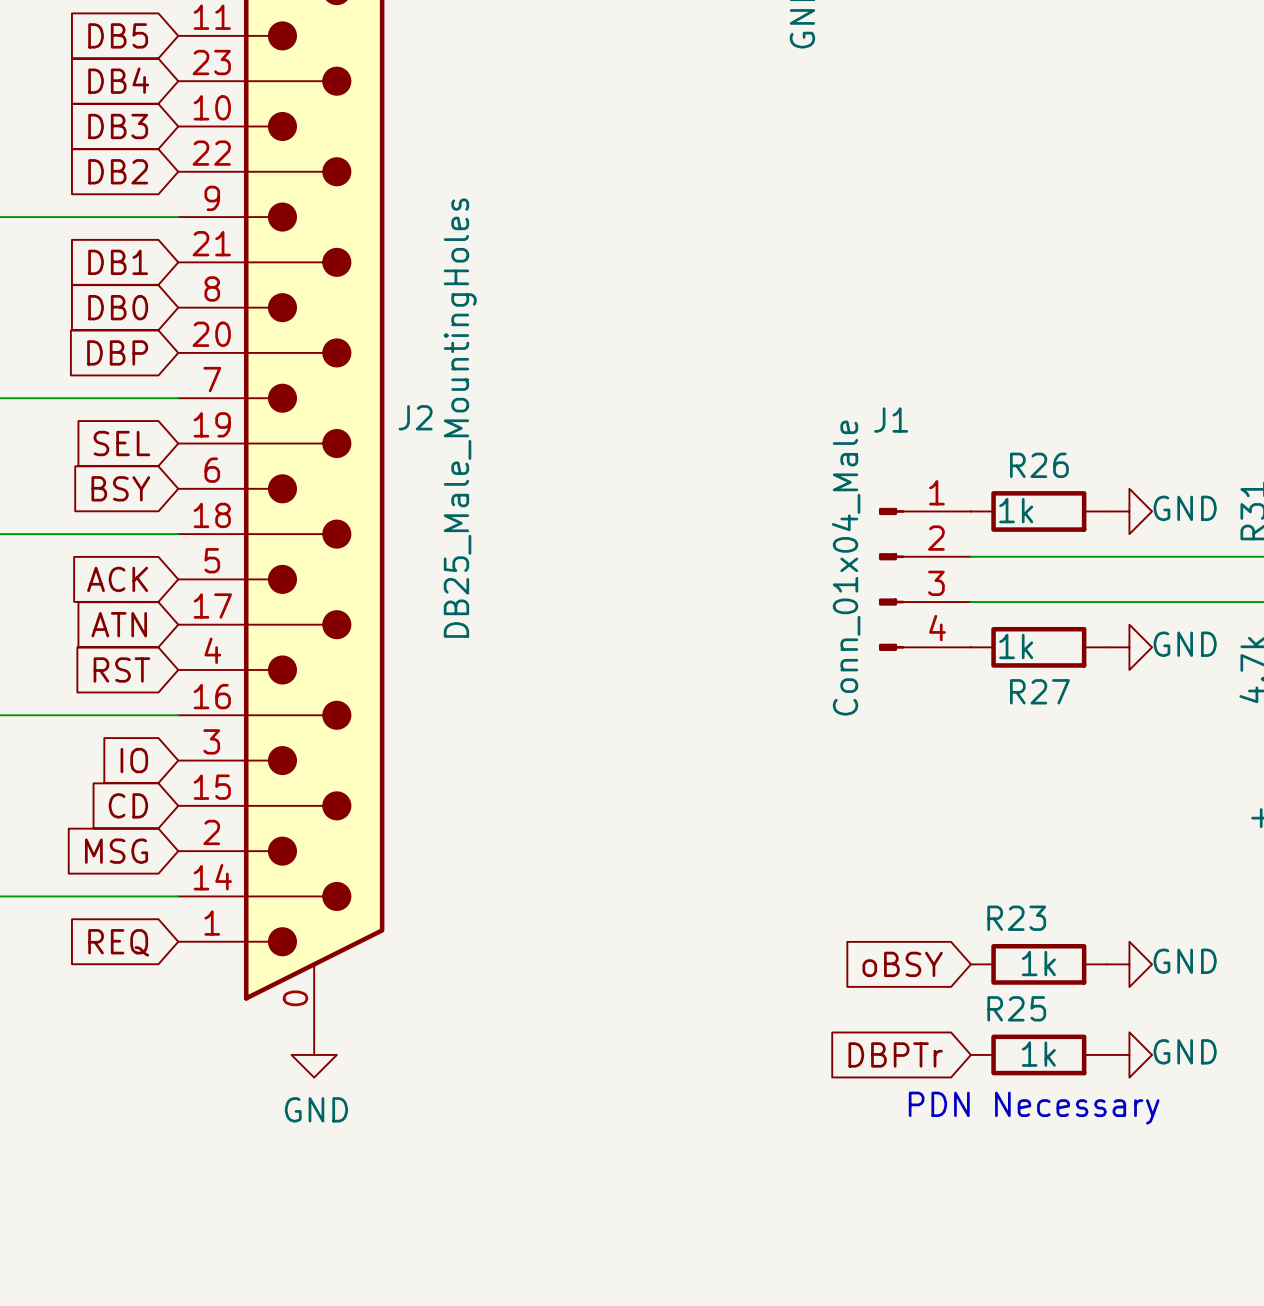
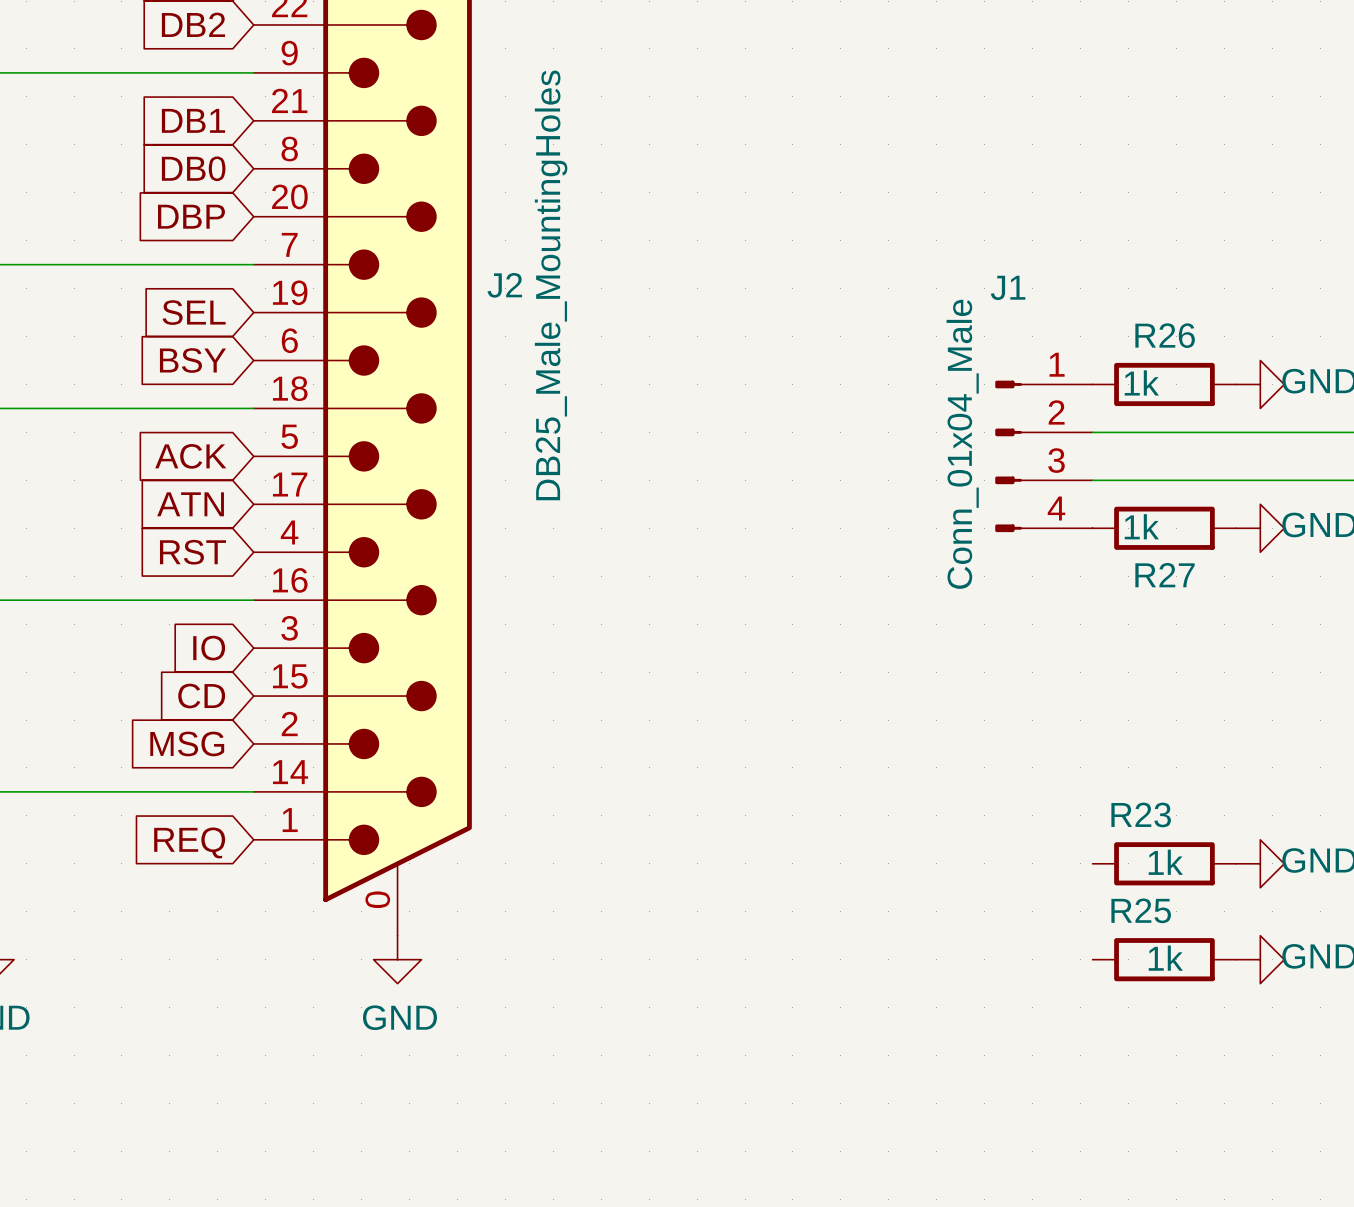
global label: oBSY (902, 964) -> none
global label: DBPTr (895, 1054) -> none
text: PDN Necessary (1034, 1108) -> none

